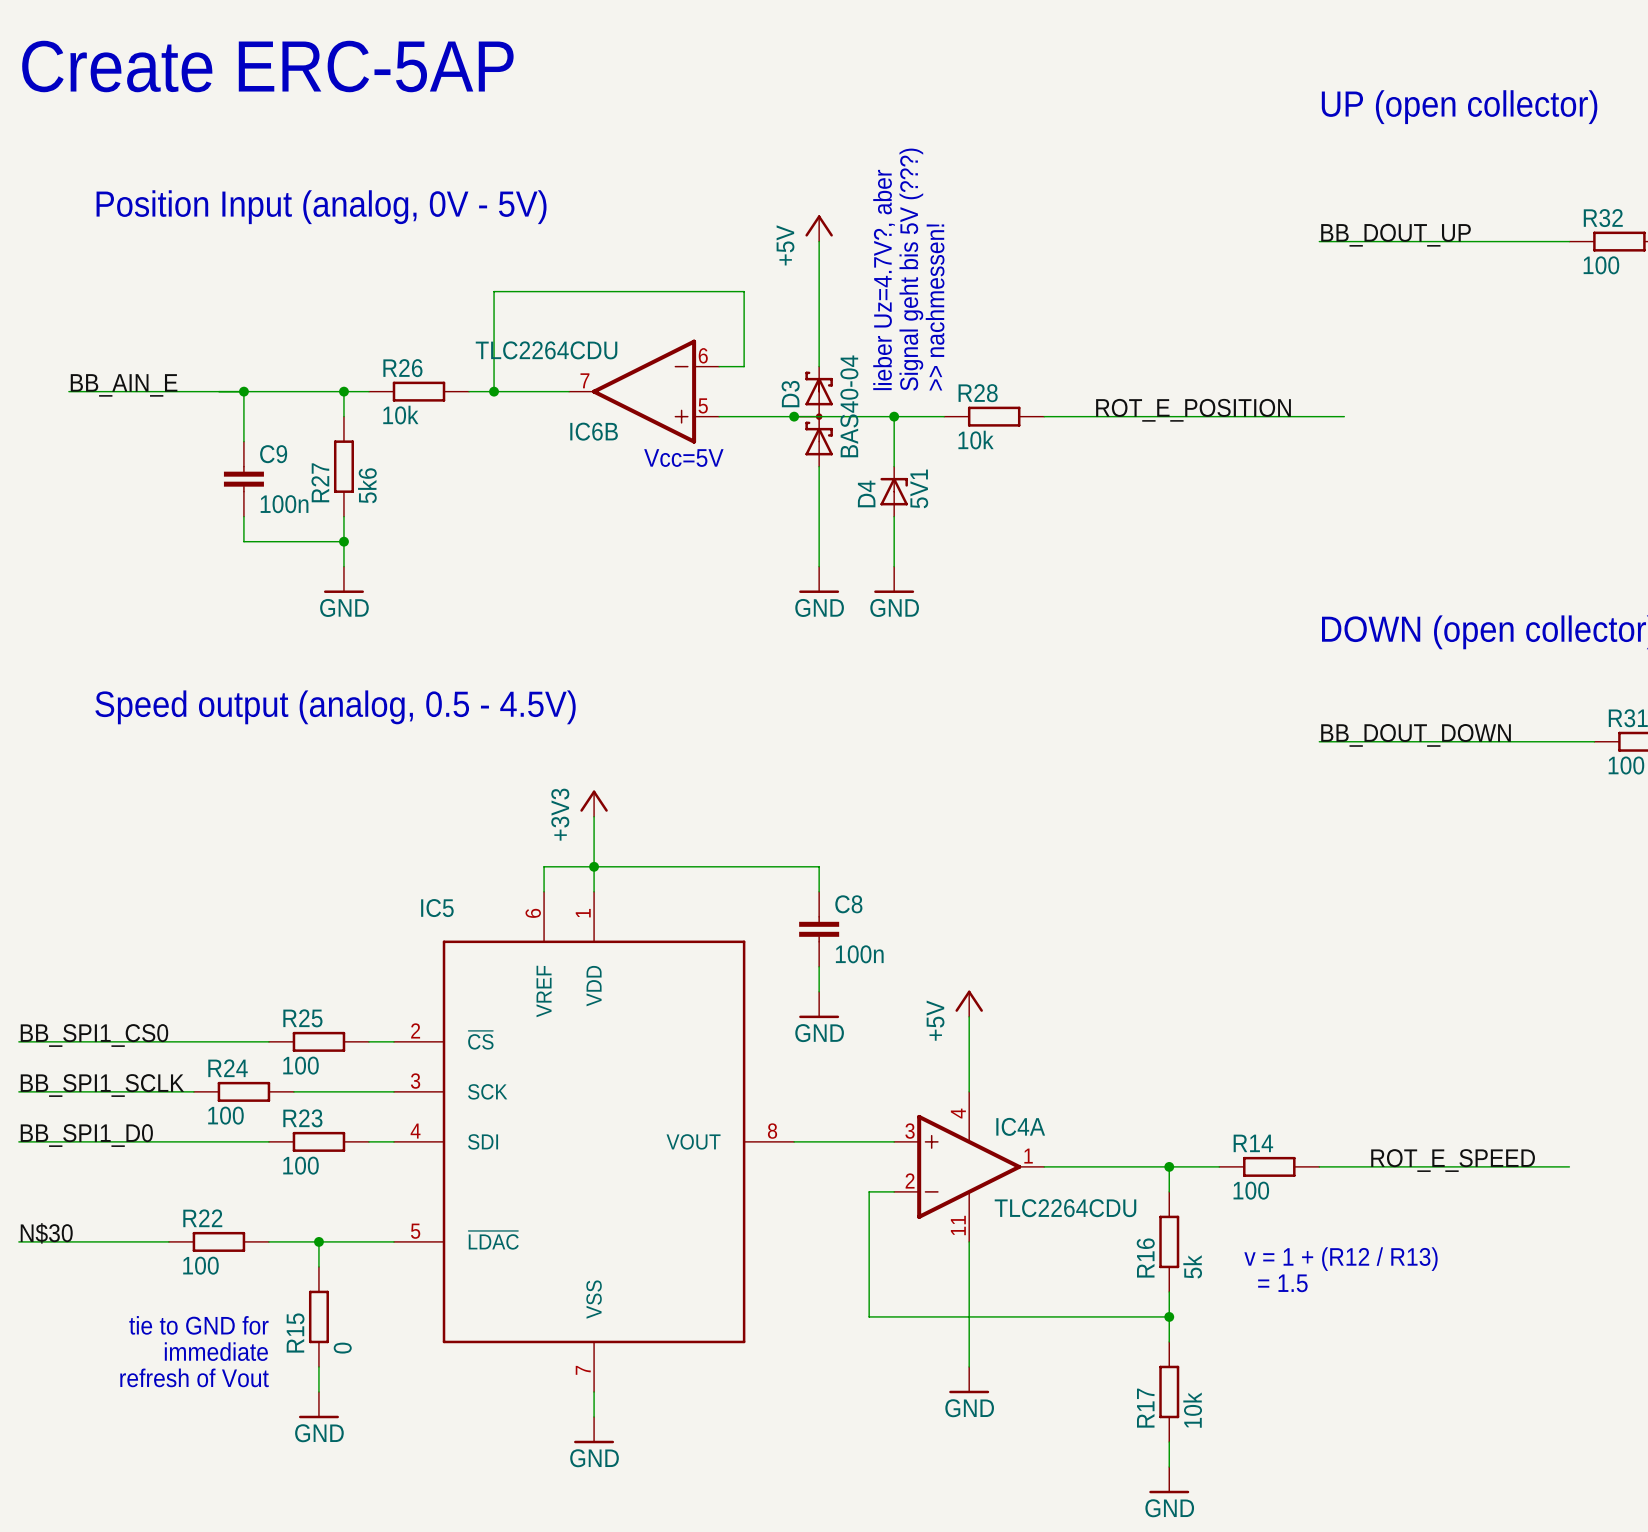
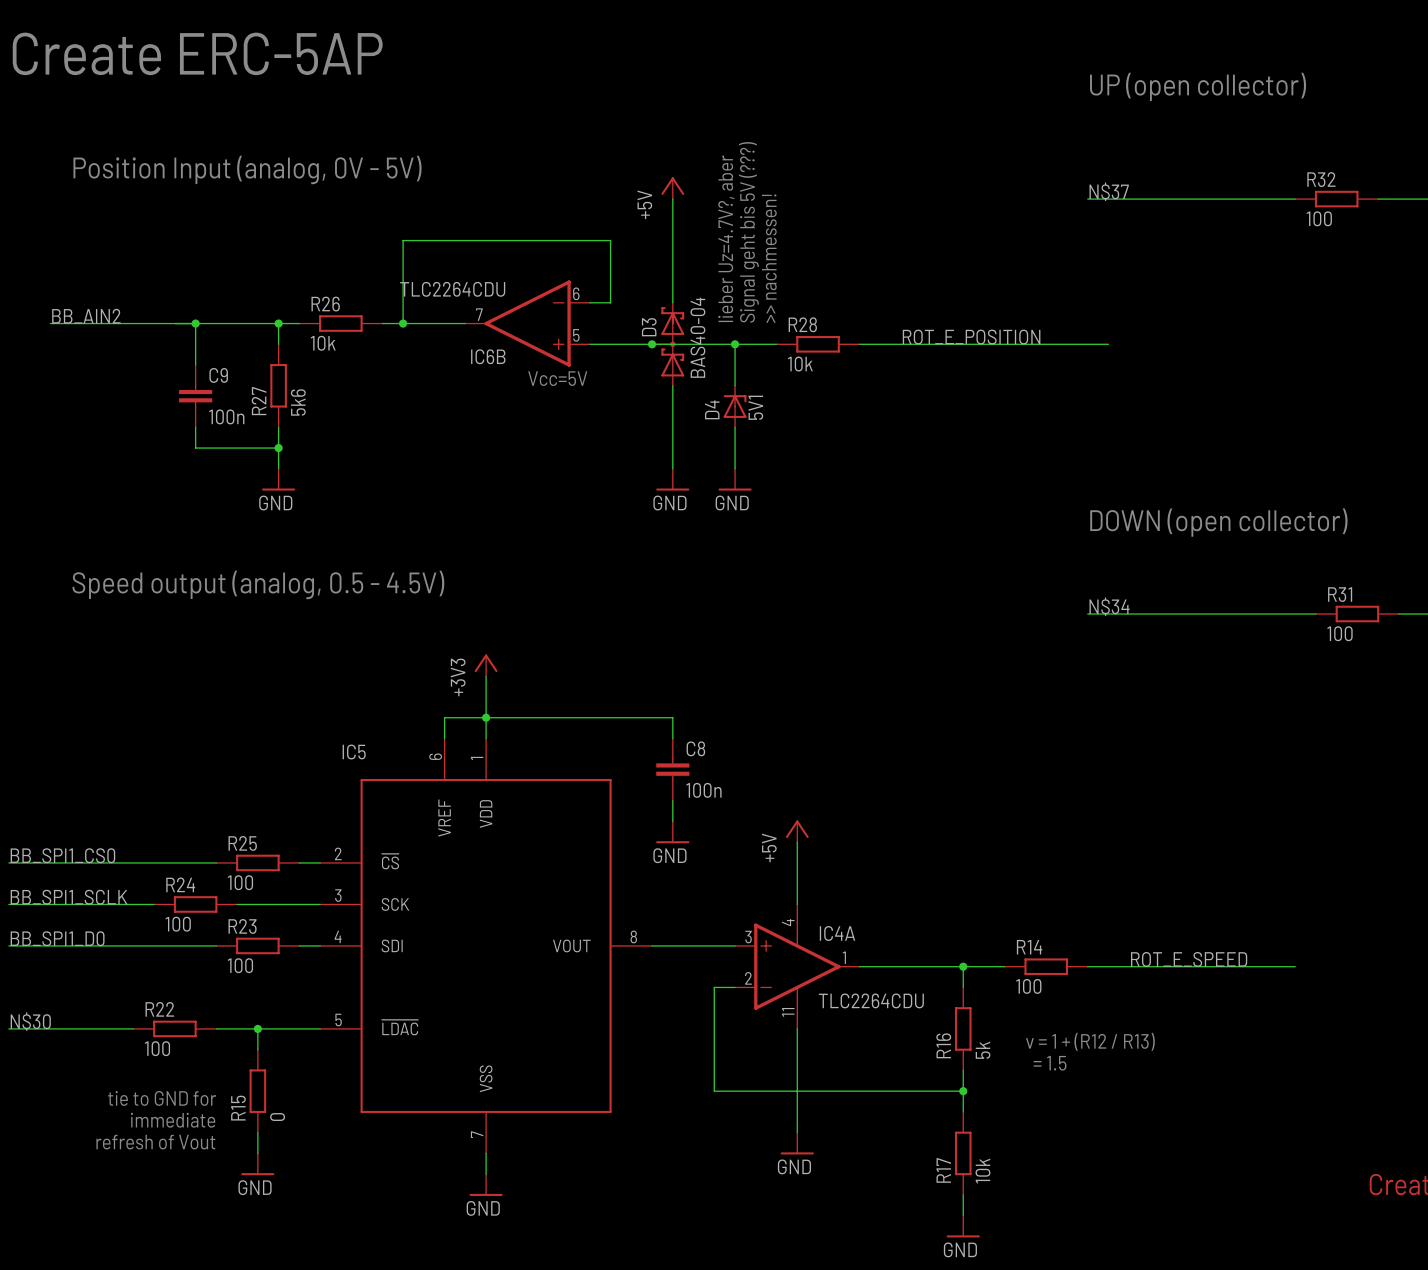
label: BB_DOUT_UP (1396, 235) -> N$37 (1109, 191)
label: BB_AIN_E (124, 385) -> BB_AIN2 (86, 316)
label: BB_DOUT_DOWN (1416, 735) -> N$34 (1109, 606)

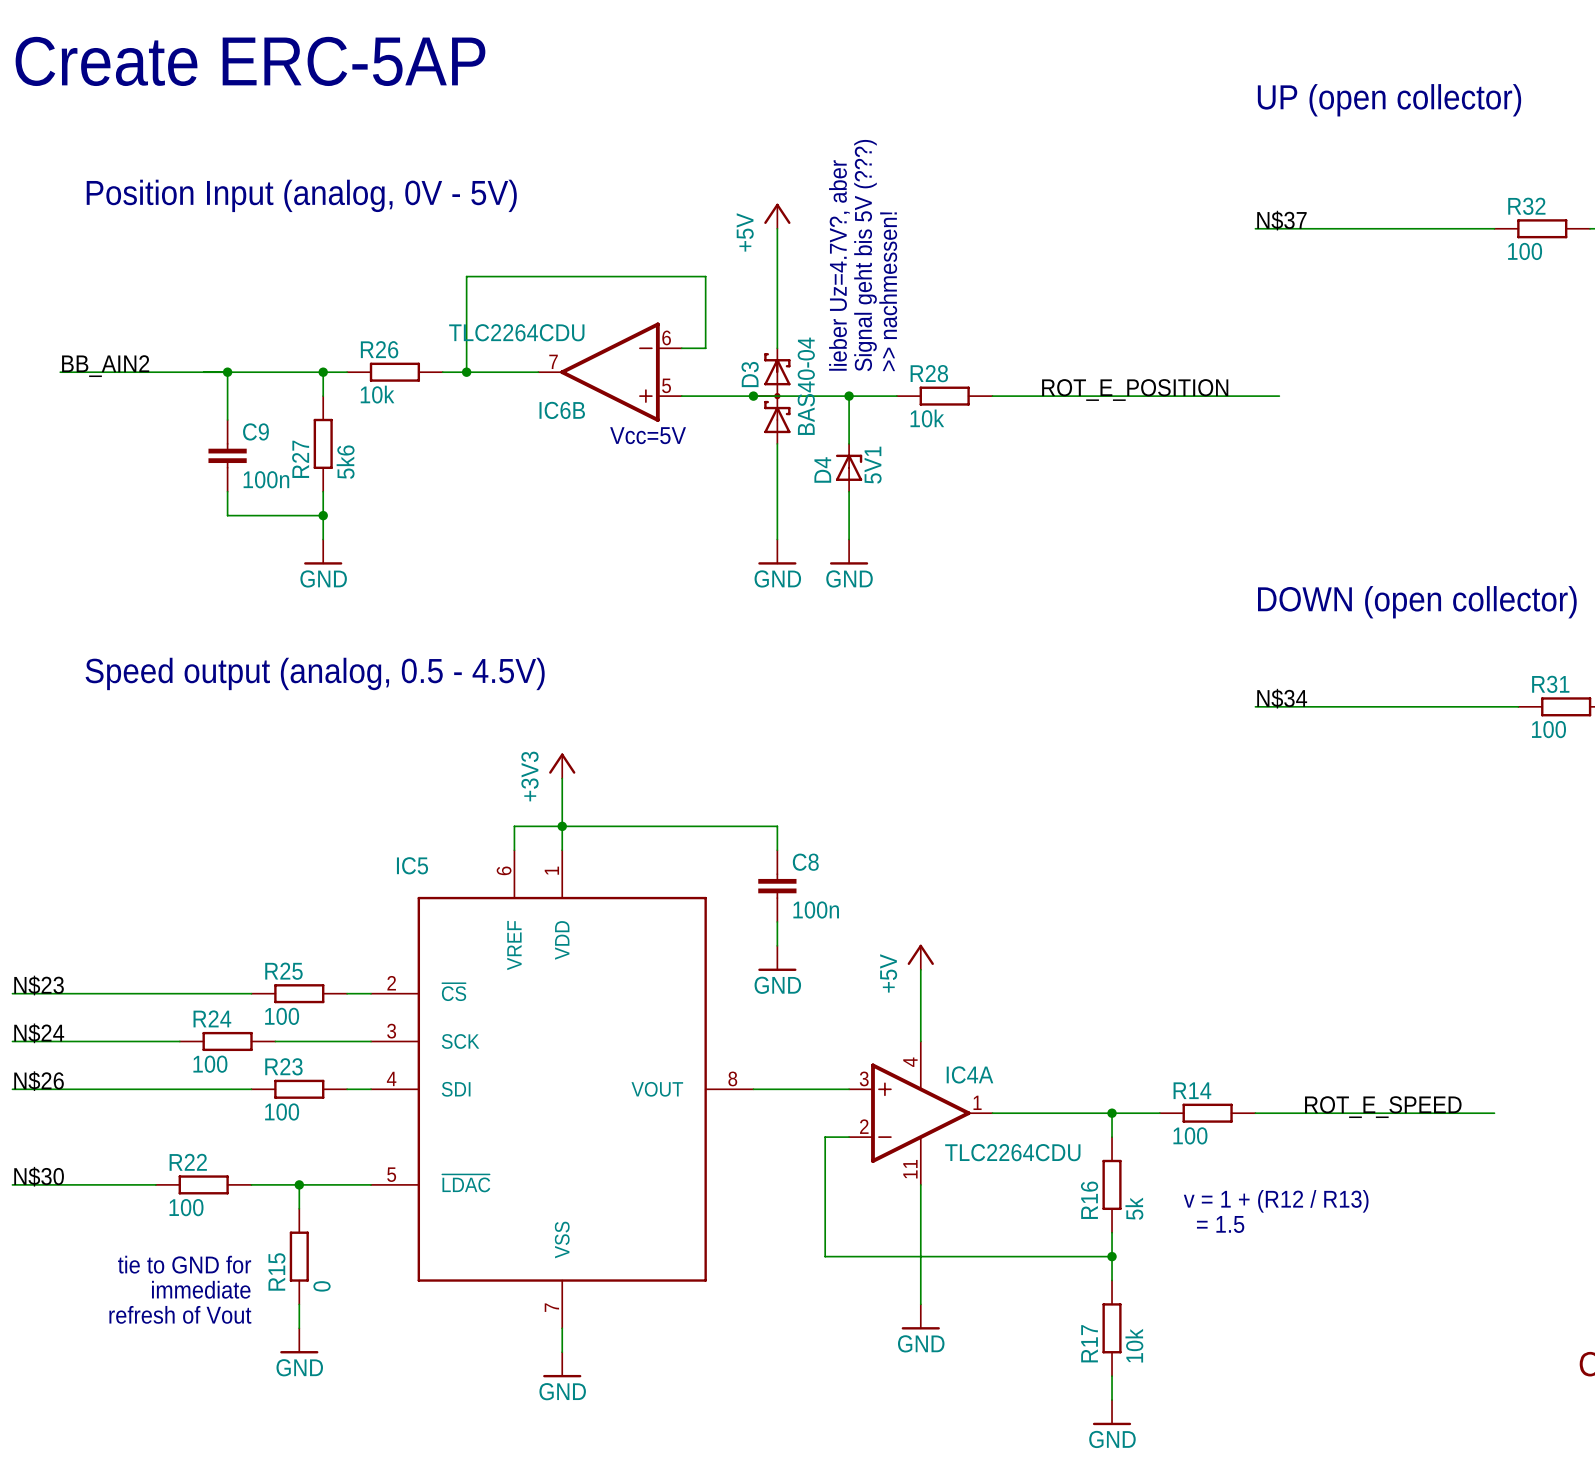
label: BB_SPI1_CS0 (62, 855) -> N$23 (39, 985)
label: BB_SPI1_SCLK (69, 897) -> N$24 (39, 1033)
label: BB_SPI1_D0 (57, 938) -> N$26 (39, 1081)

